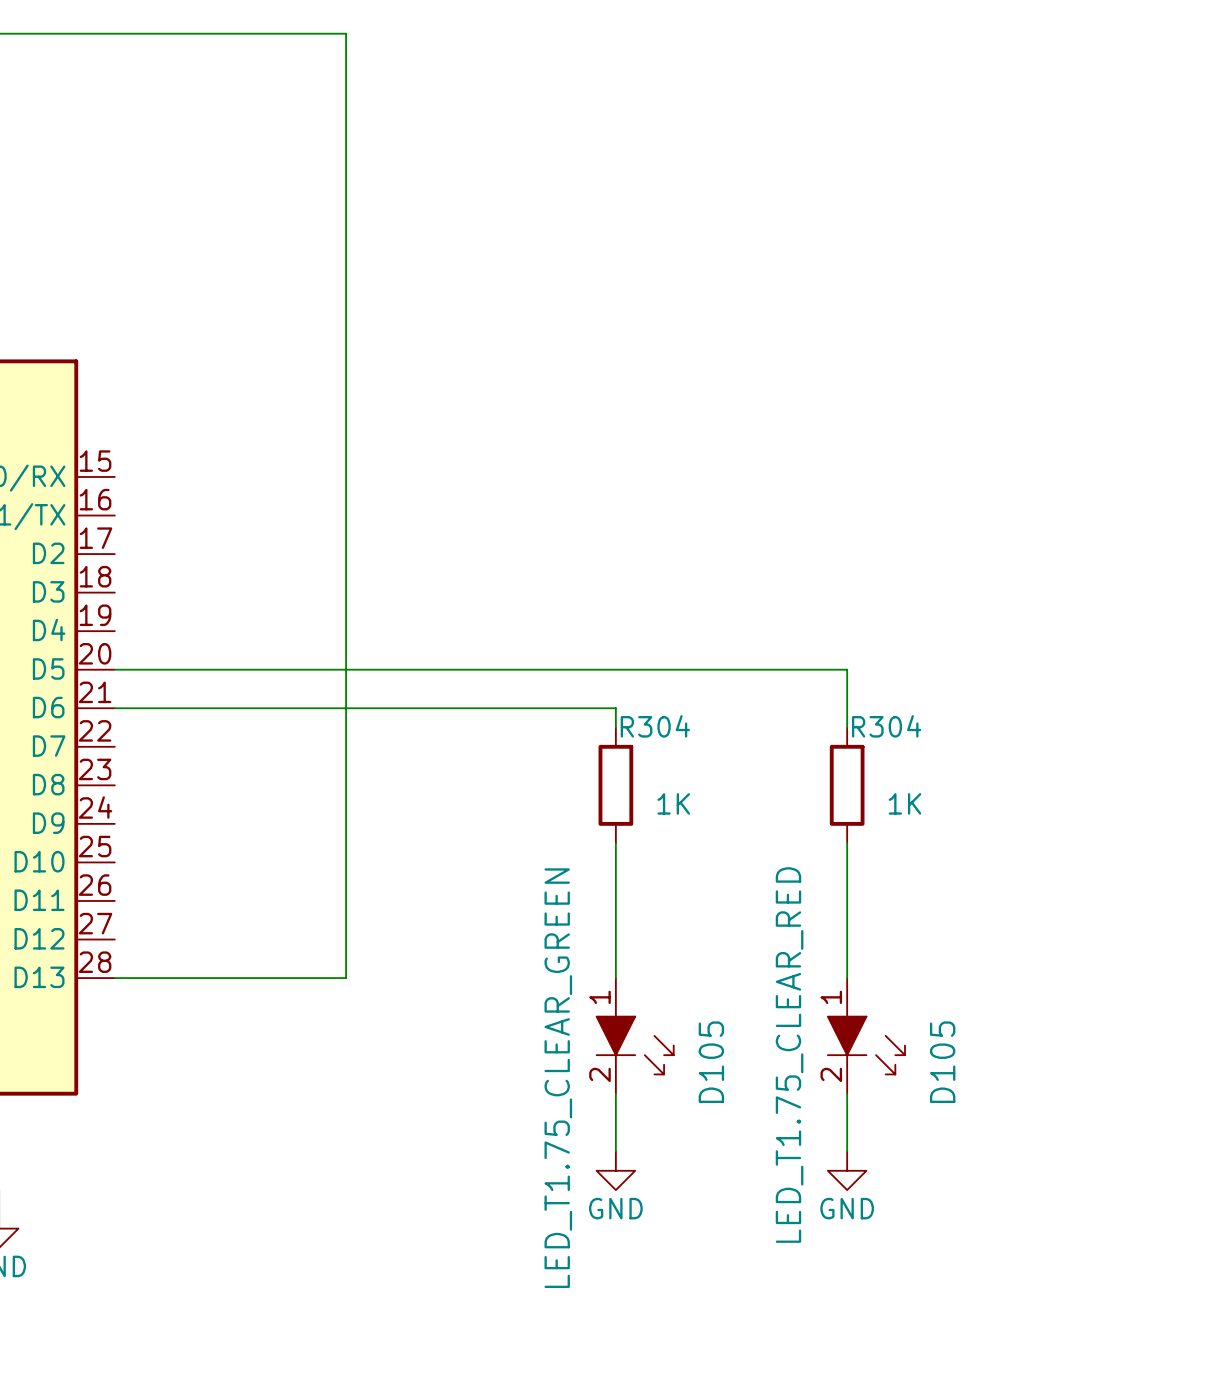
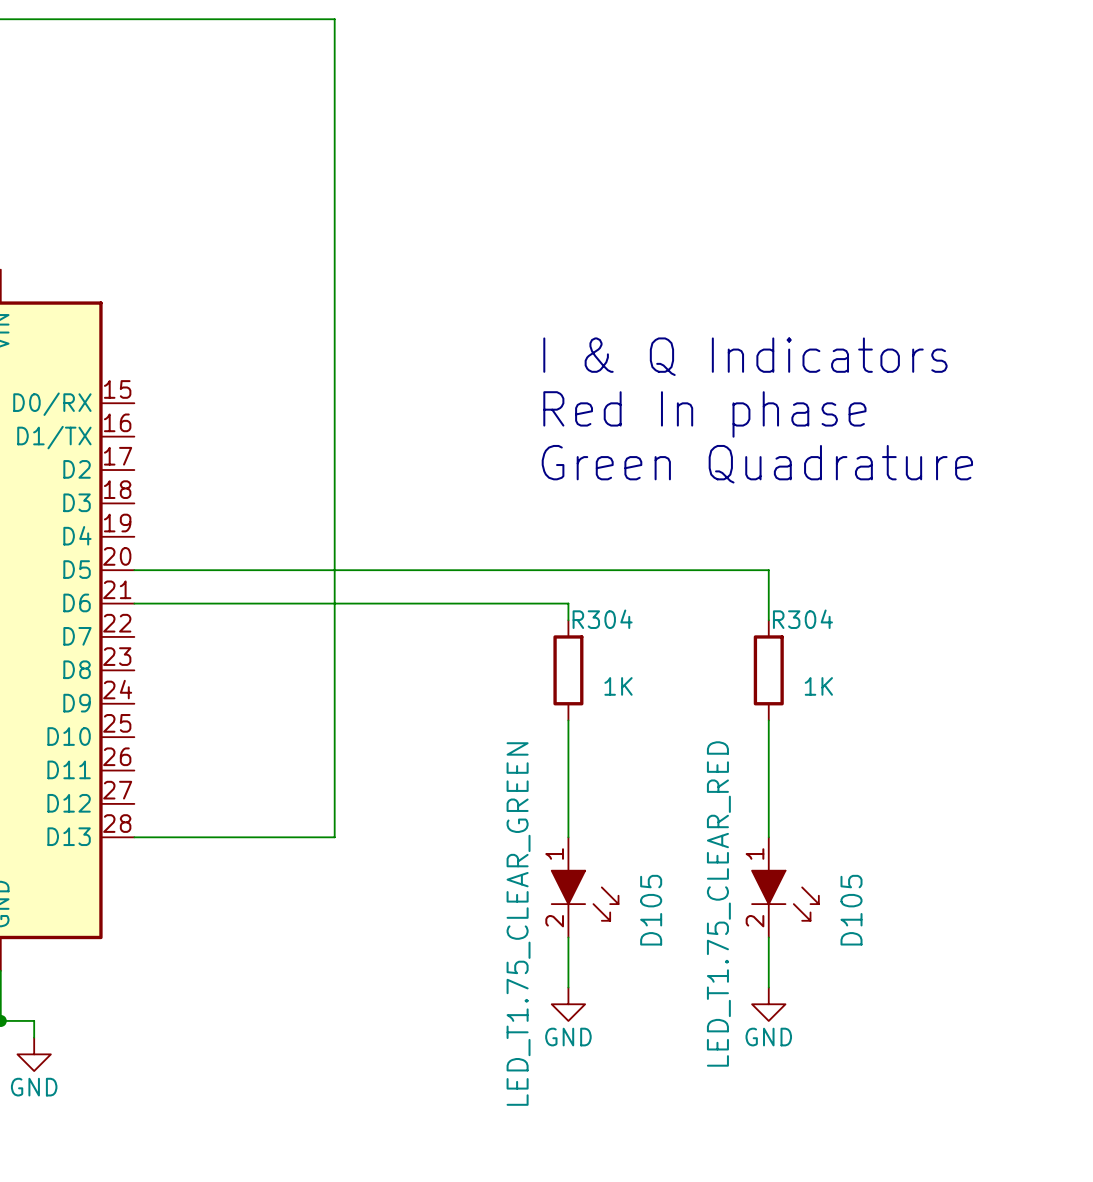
text: none -> I & Q Indicators (745, 356)
text: none -> Red In phase (704, 414)
text: none -> Green Quadrature (757, 464)

